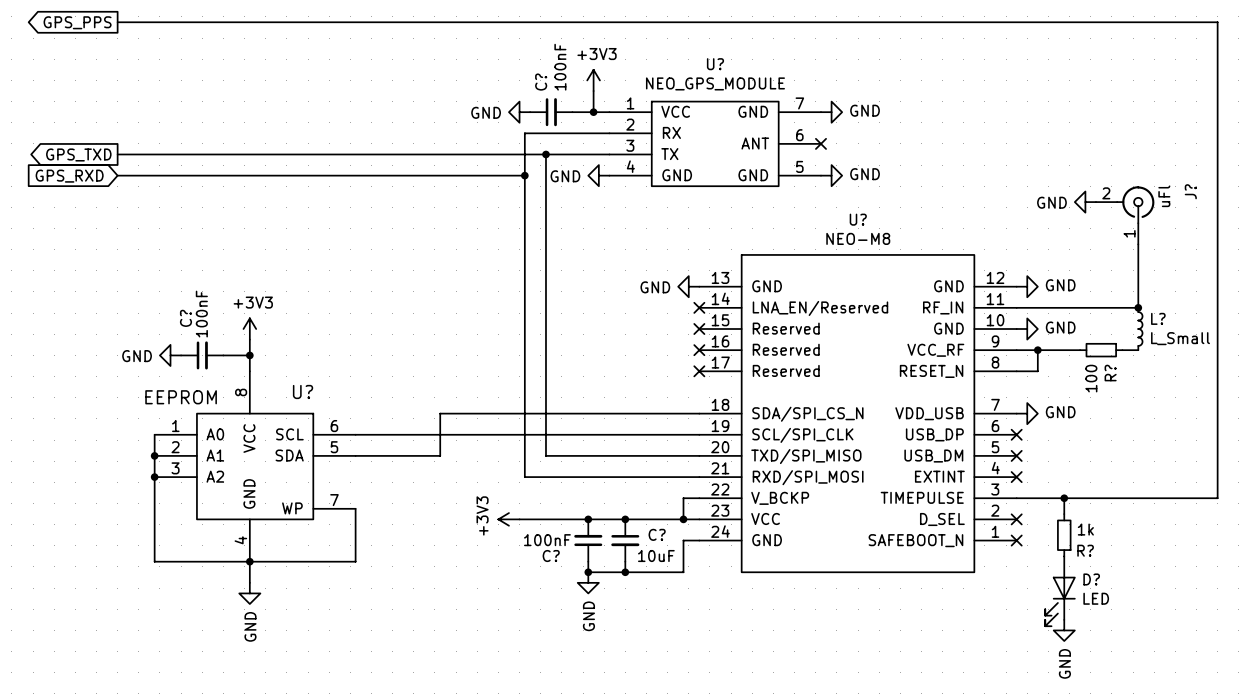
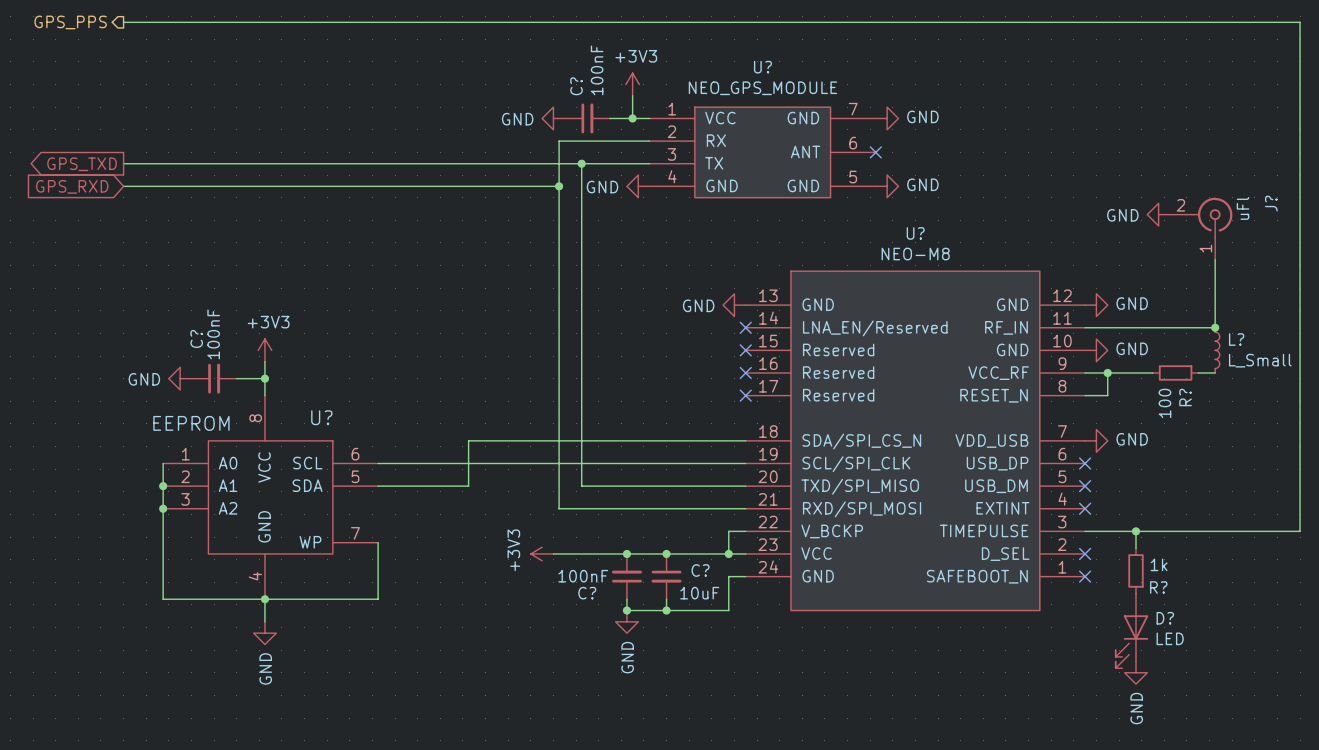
hierarchical label: none -> GPS_PPS (70, 22)
global label: GPS_PPS (77, 22) -> none

